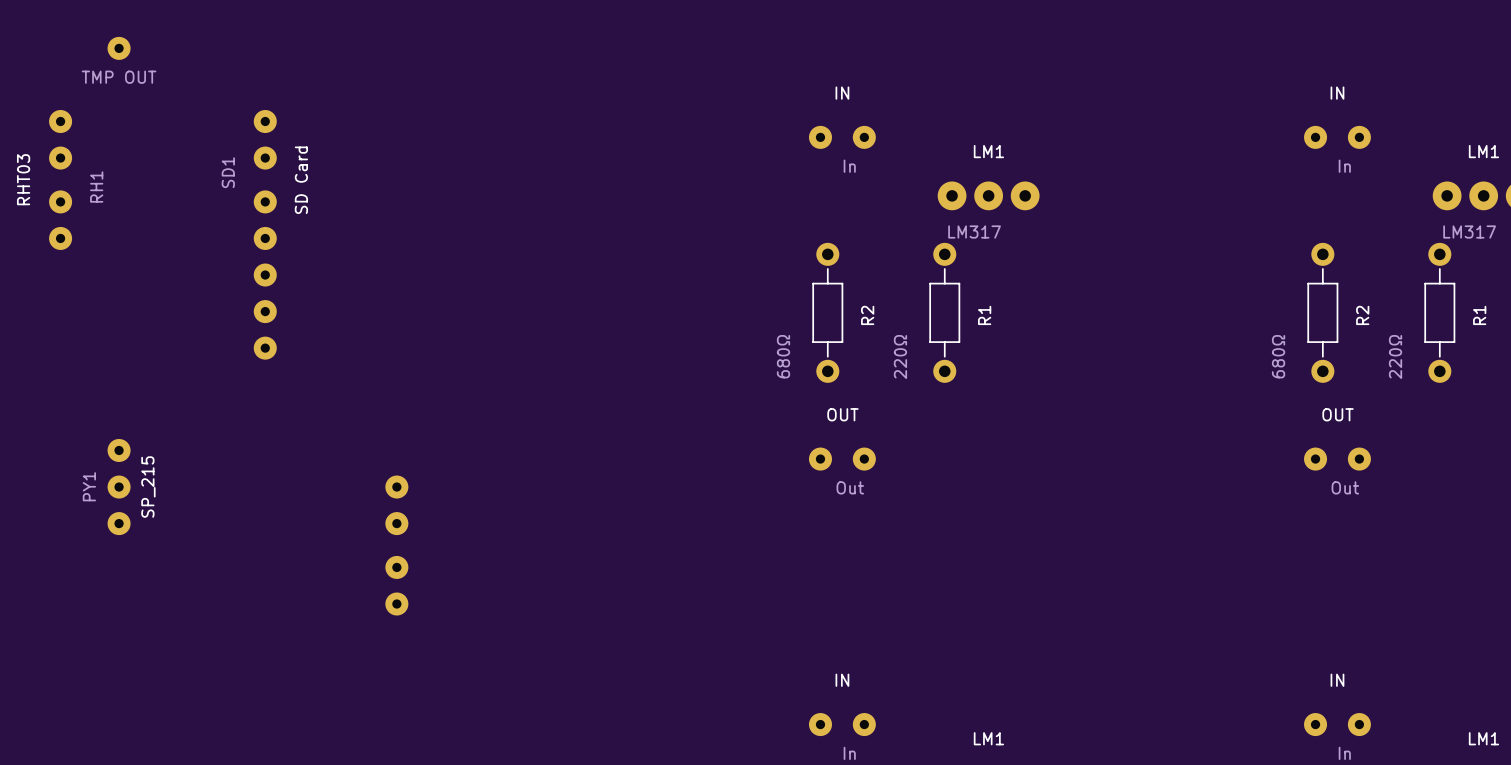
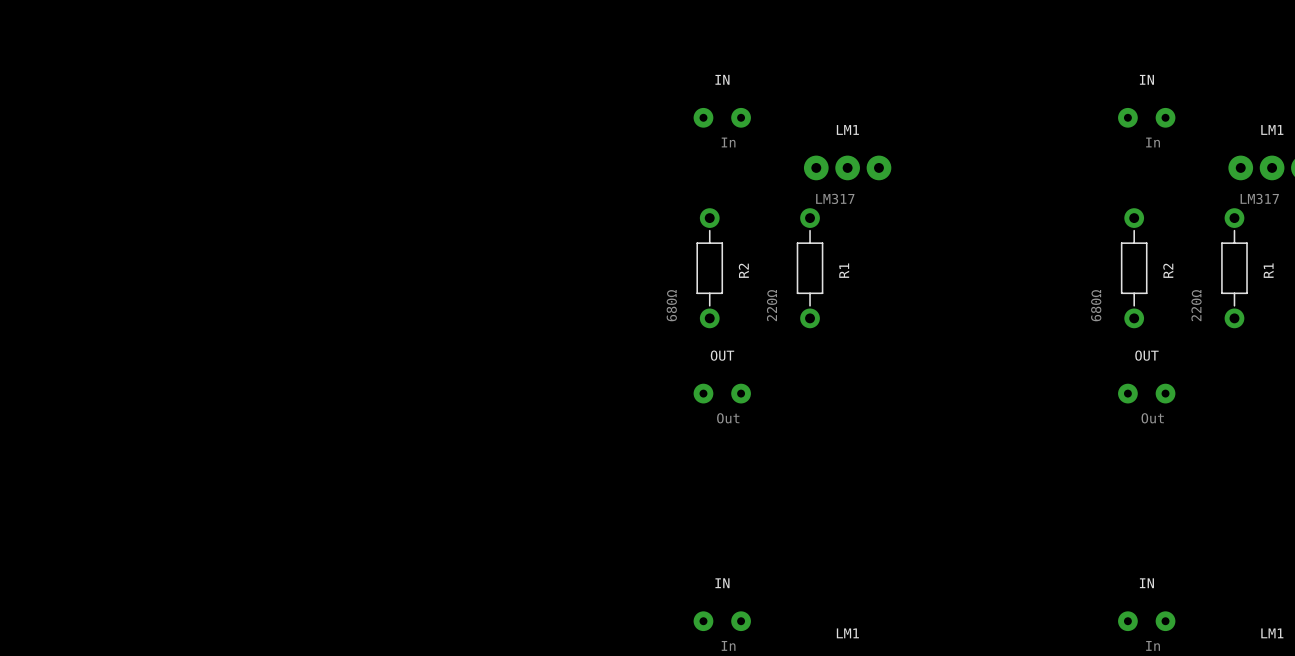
part: TMP OUT (119, 48) -> none
RHT03: RH1 (60, 179) -> none
SD Card: SD1 (265, 179) -> none
part: (265, 311) -> none
SP_215: PY1 (119, 487) -> none
part: (396, 545) -> none

